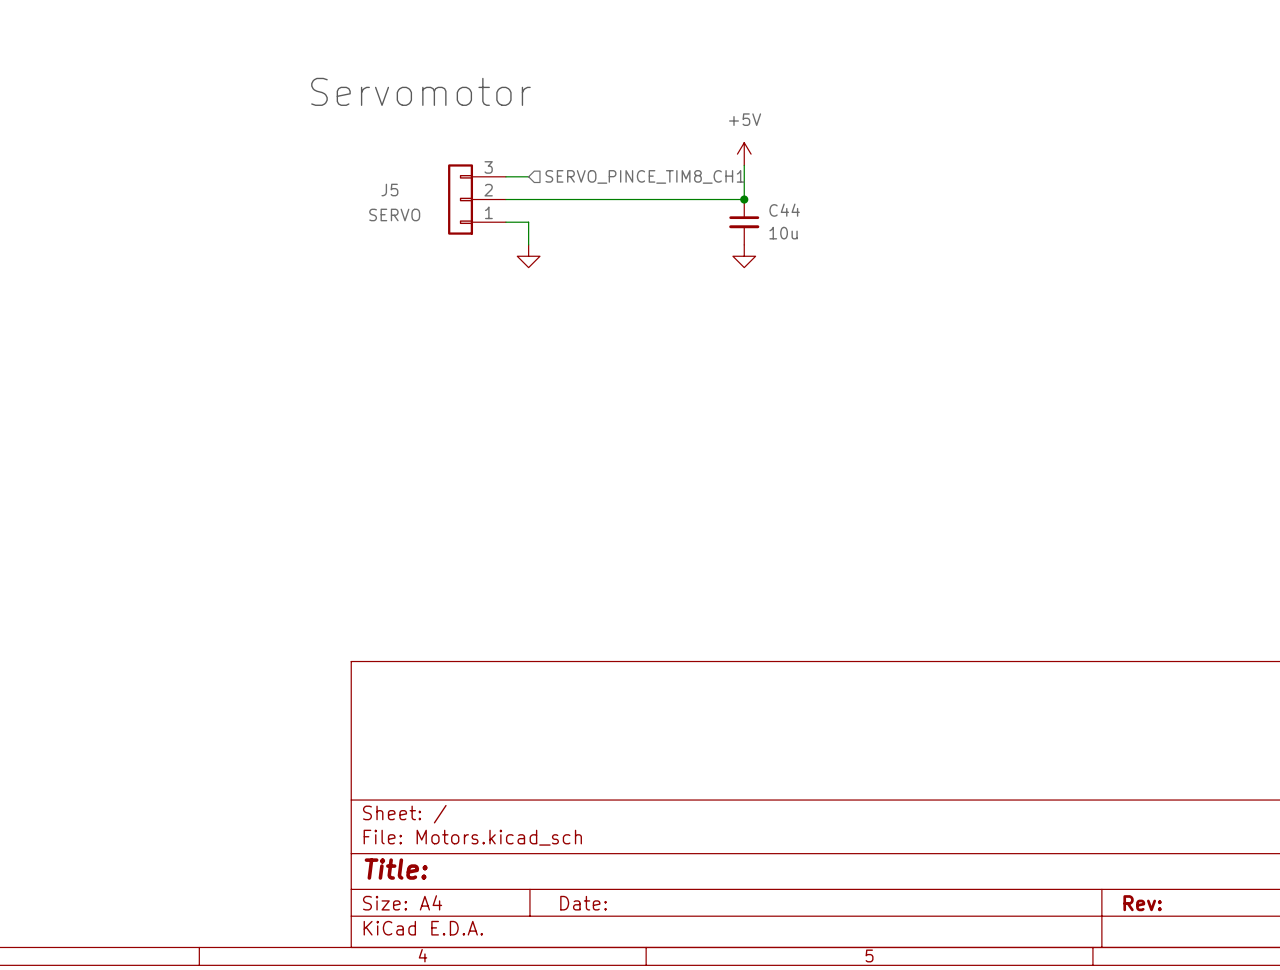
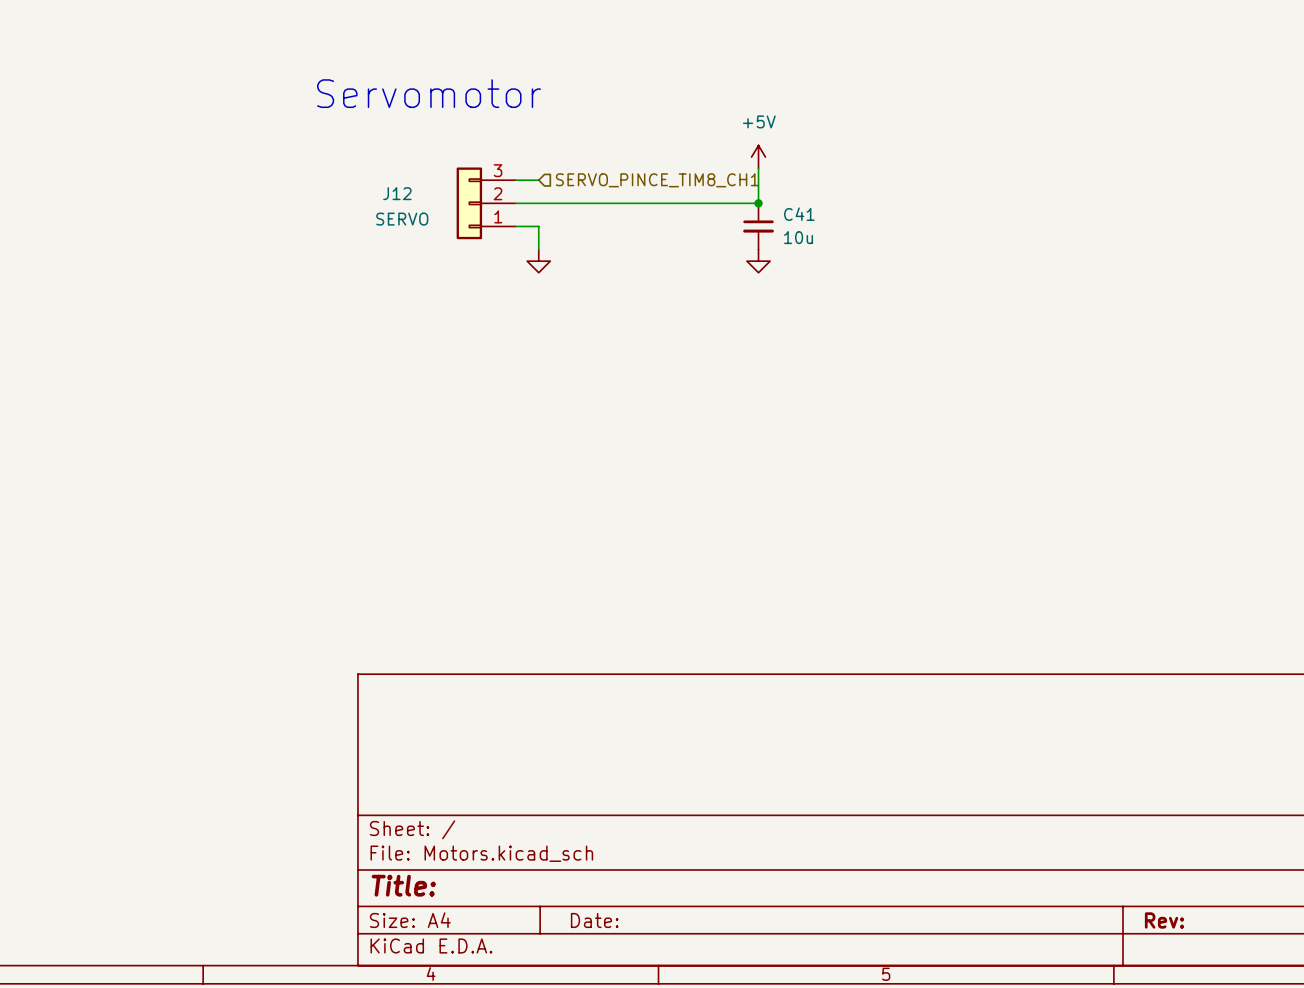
J5 name: J5 (389, 190) -> J12 (397, 193)
C44 name: C44 (784, 210) -> C41 (799, 214)

